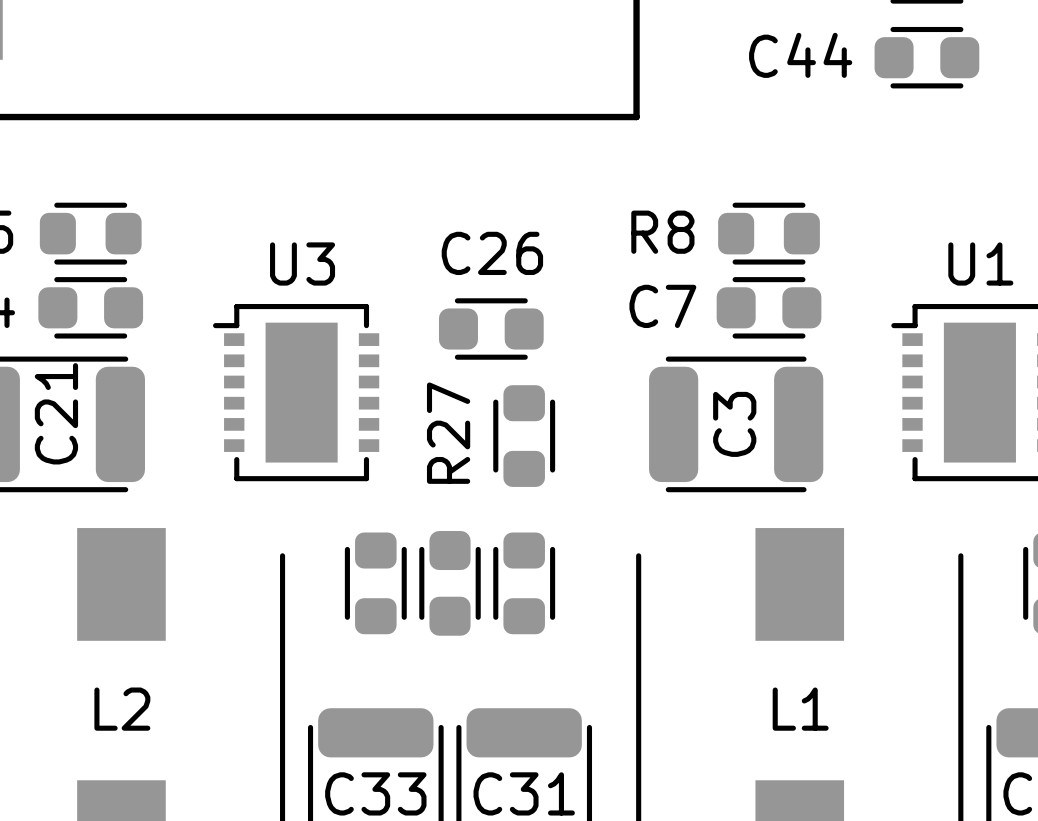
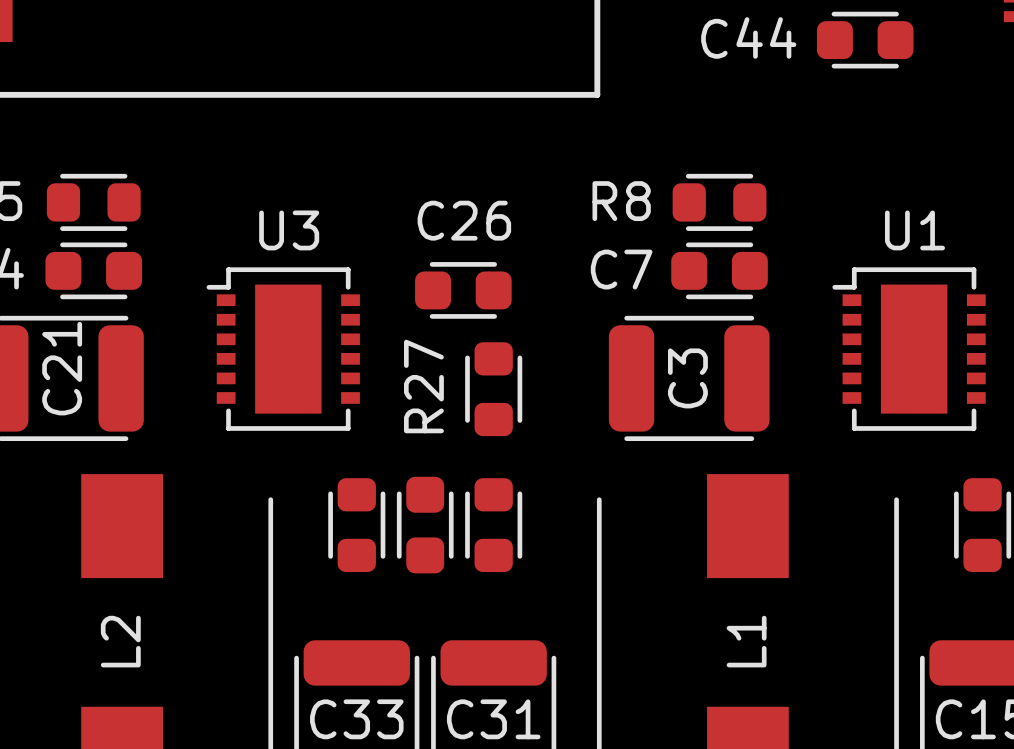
L2 name rotation: 0° (122, 709) -> 90° counterclockwise (120, 641)
L1 name rotation: 0° (800, 709) -> 90° counterclockwise (746, 641)

